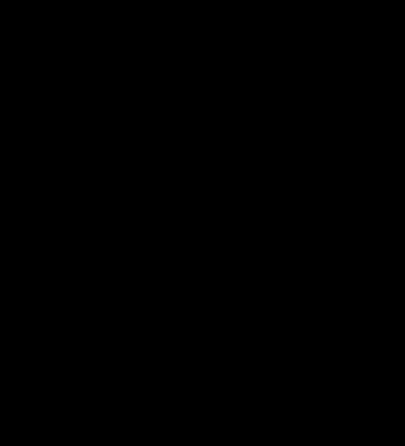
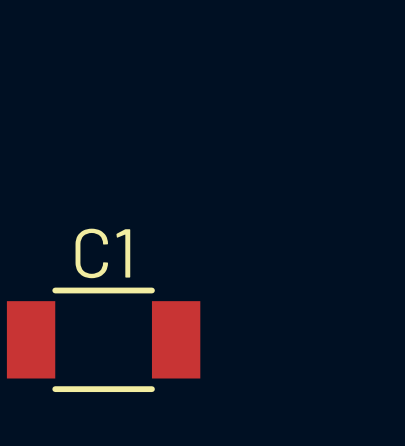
C1: none -> (103, 339)

